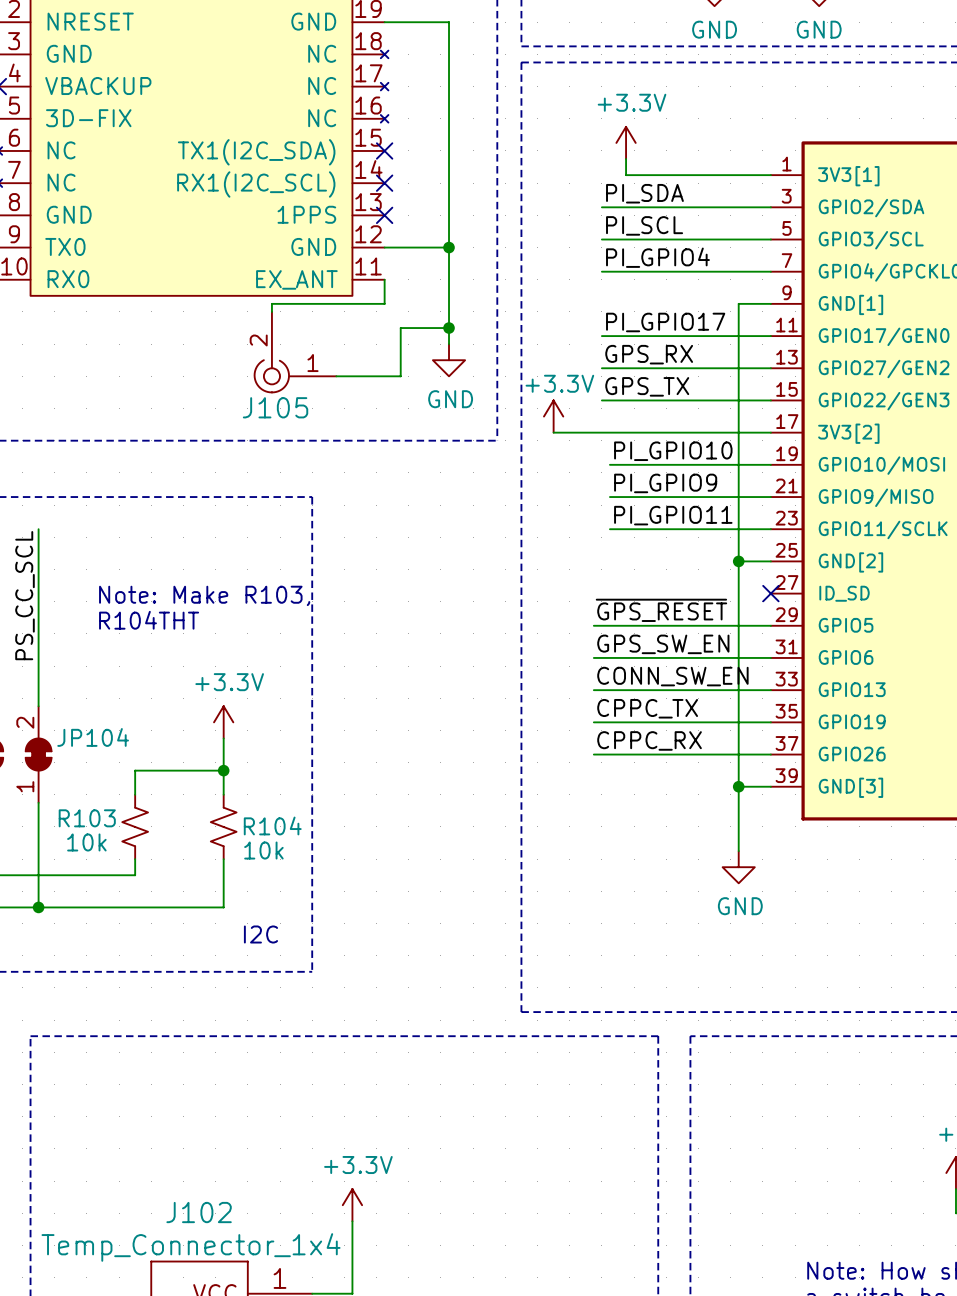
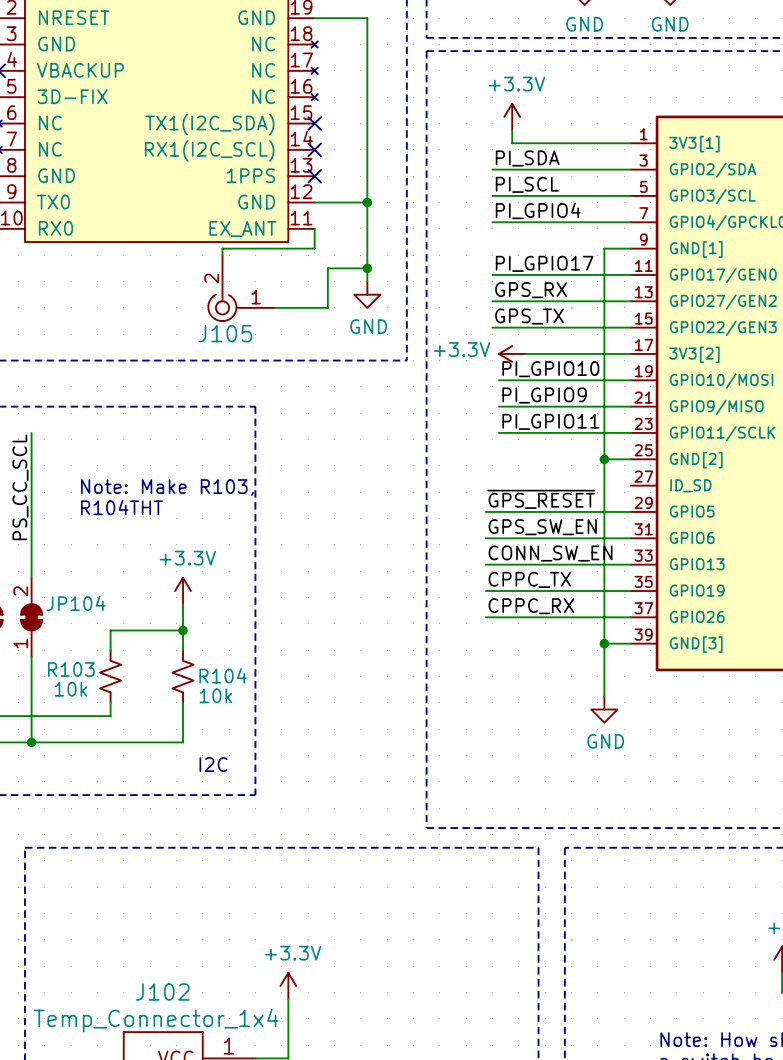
power symbol text position: +3.3V (559, 383) -> +3.3V (462, 349)
power symbol rotation: 0° (553, 416) -> 90° counterclockwise (512, 353)
power symbol position: +3.3V (553, 416) -> +3.3V (512, 353)
wire: (553, 432) (642, 432) -> none
no-connect mark: (770, 593) -> none

